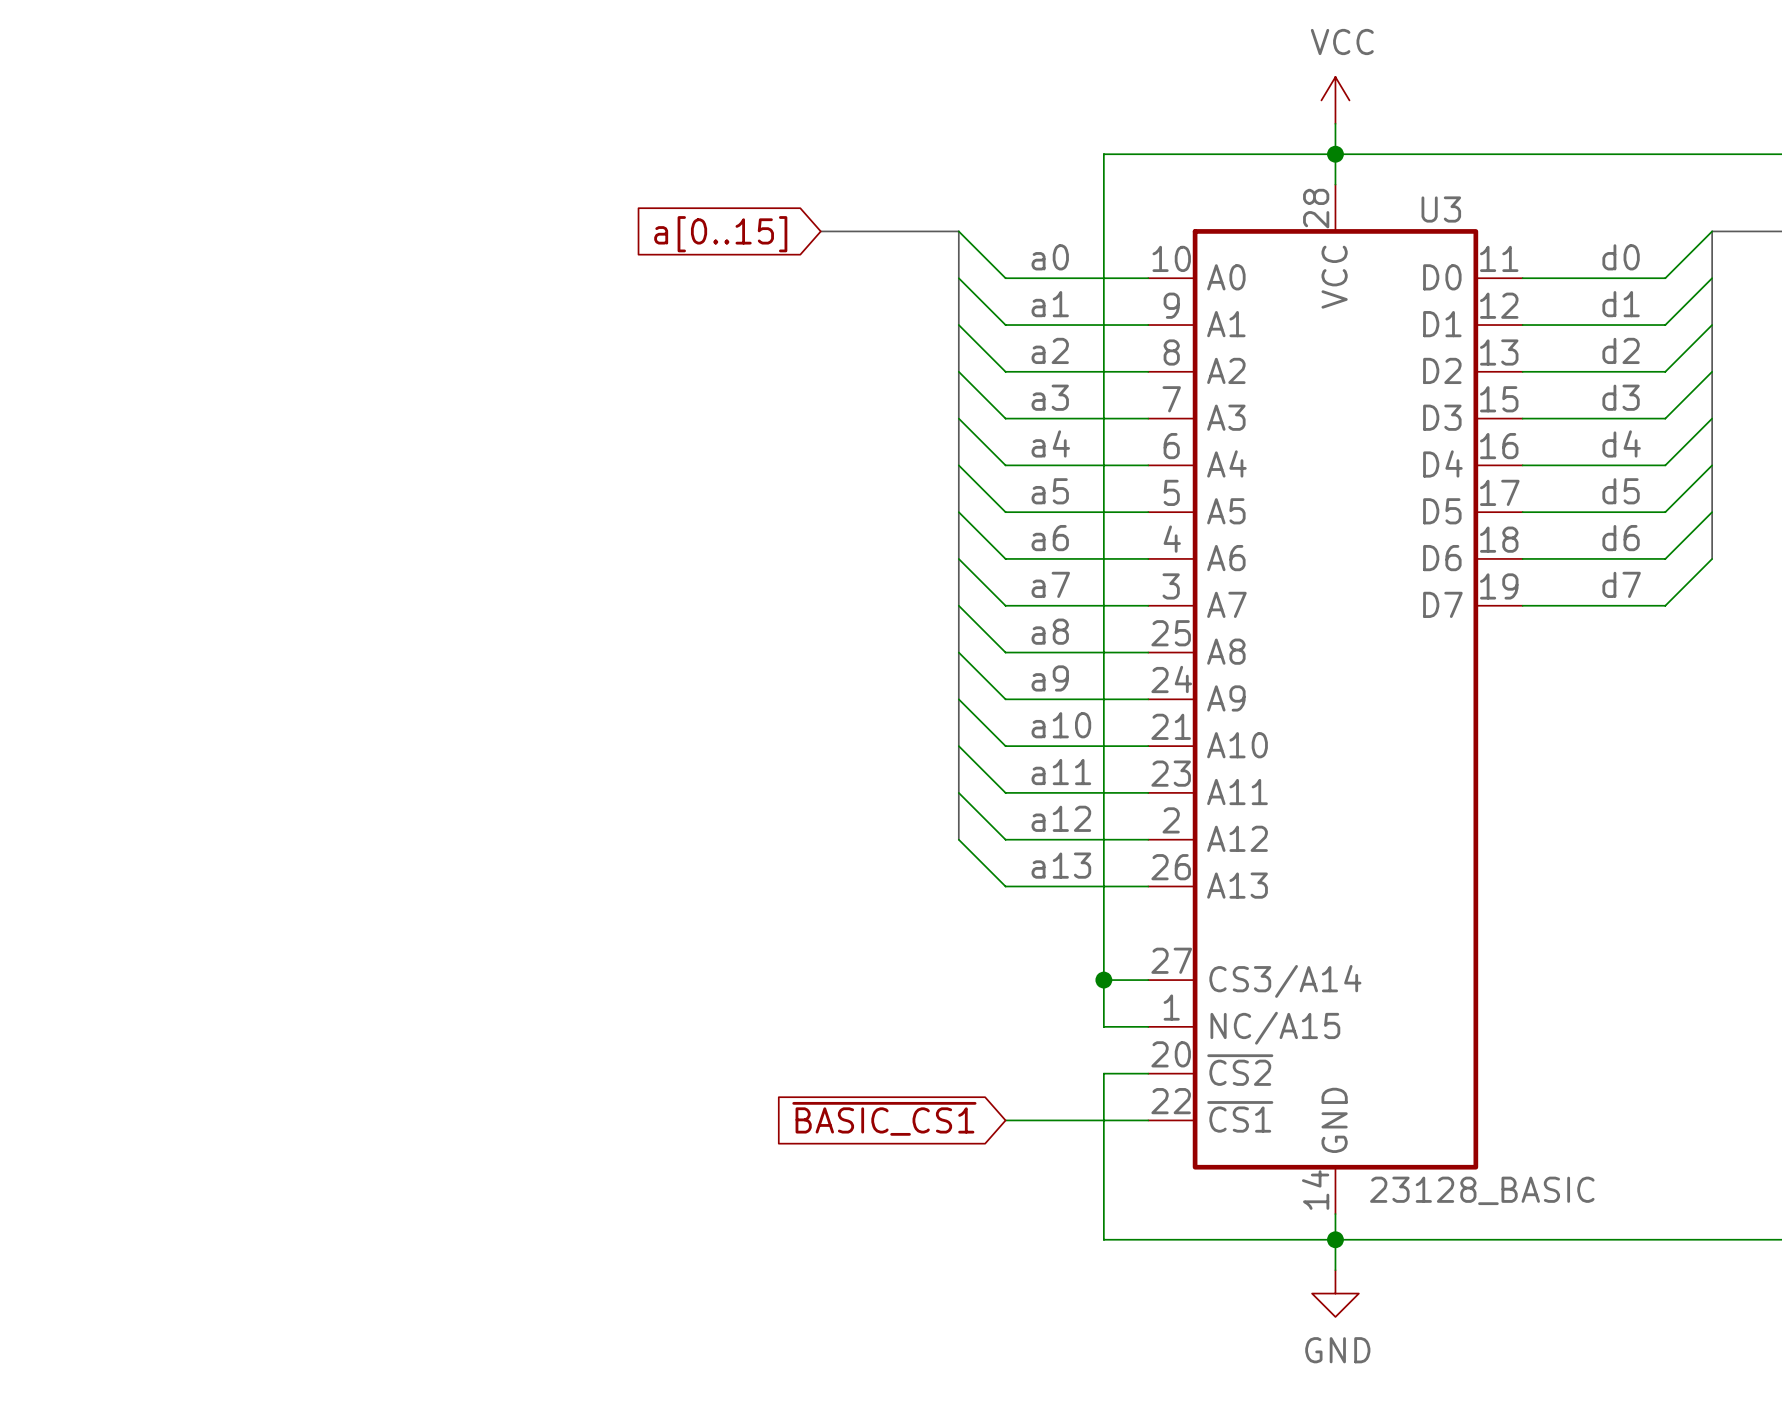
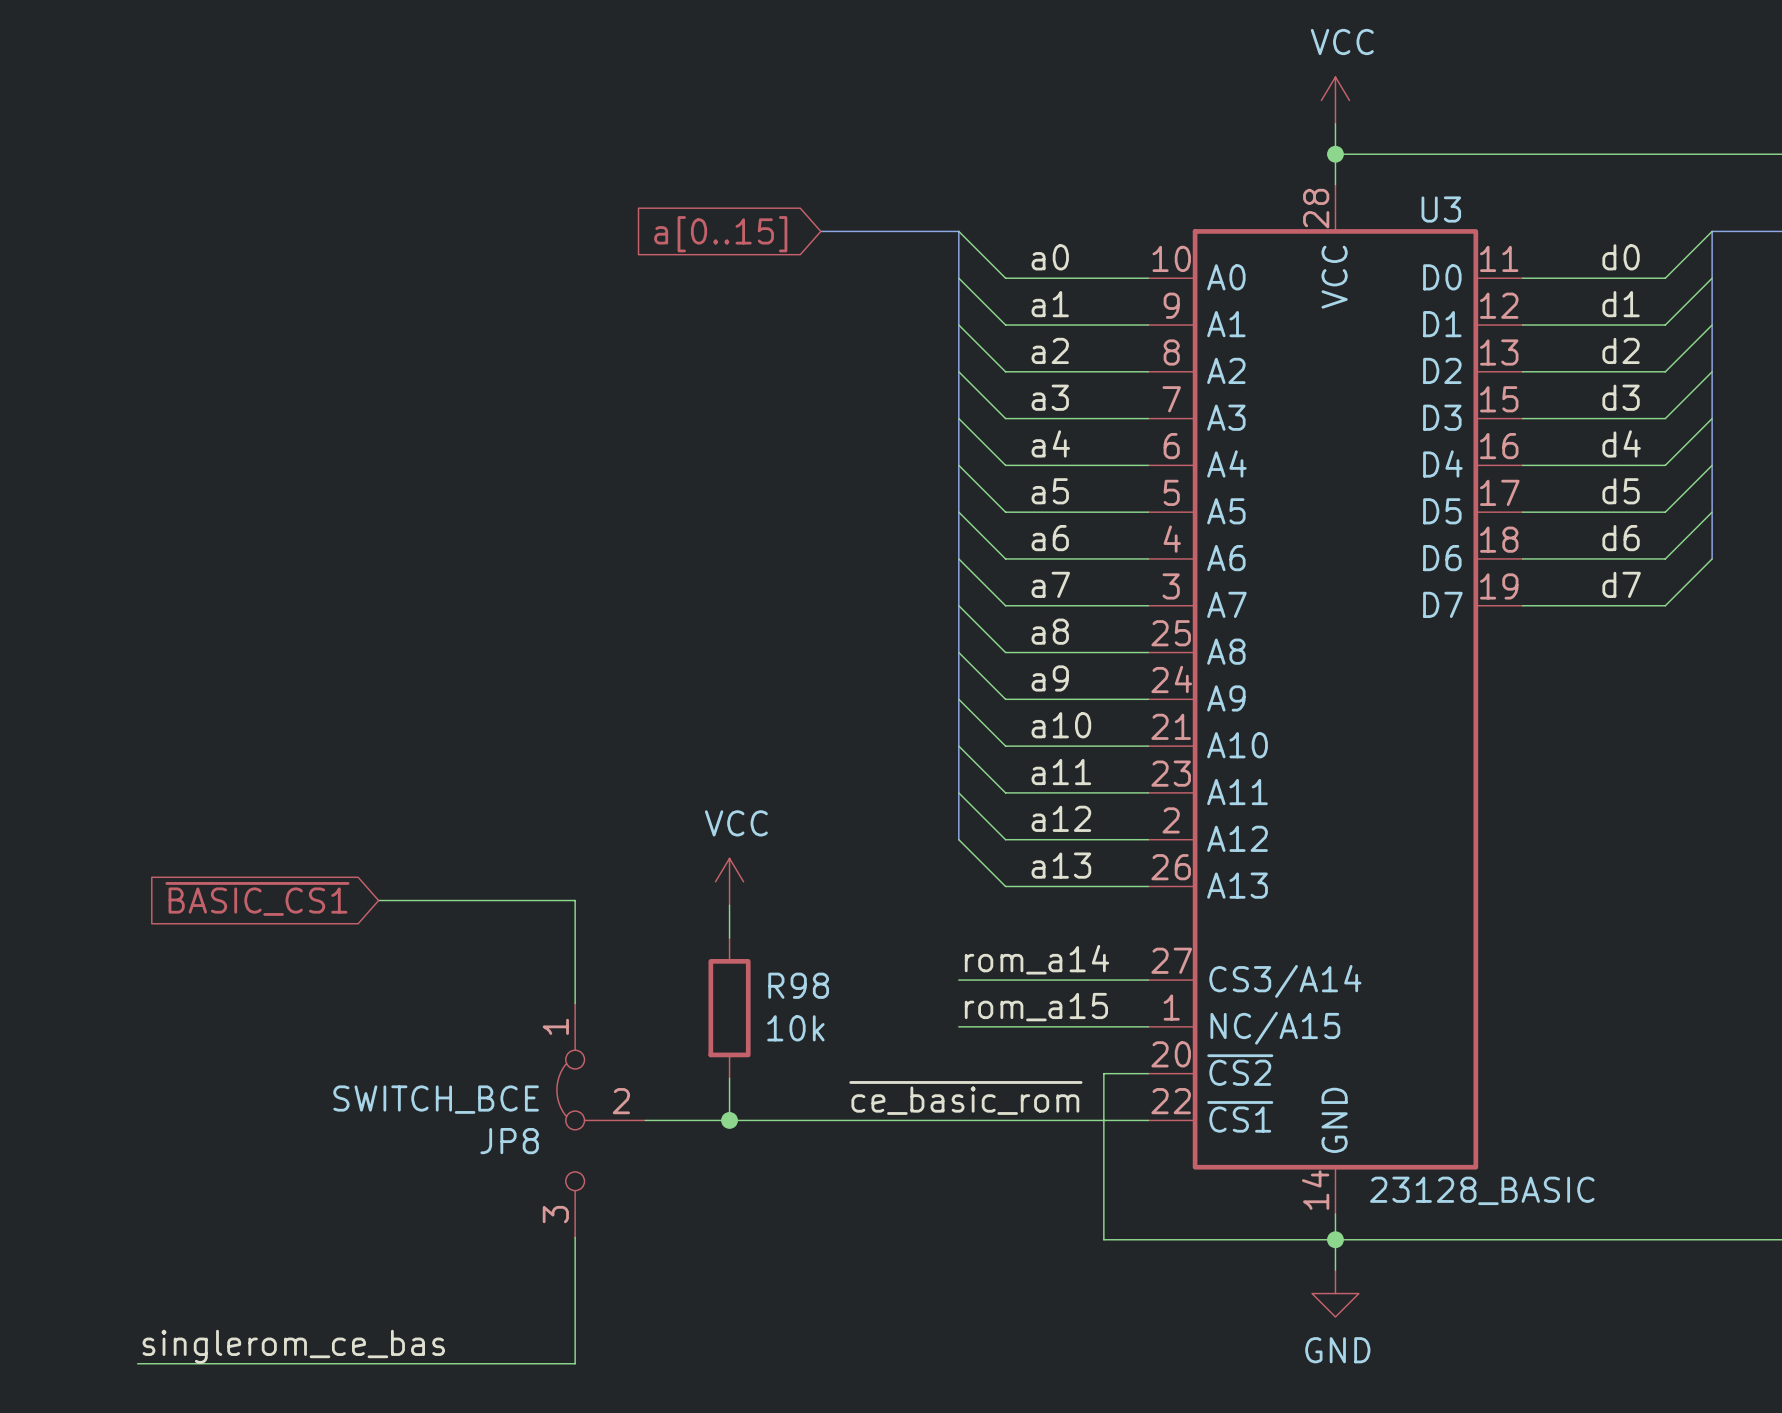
wire: (1335, 154) (1103, 154) (1103, 1026) -> (958, 1026) (1103, 1026)
power symbol: none -> VCC (729, 881)
global label: none -> ~{BASIC_CS1} (257, 898)
wire: none -> (378, 900) (575, 900) (575, 1003)
wire: none -> (729, 905) (729, 937)
label: none -> rom_a14 (1036, 959)
wire: none -> (958, 980) (1103, 980)
junction: (1103, 980) -> none
label: none -> rom_a15 (1036, 1007)
R98: none -> 10k (729, 1008)
wire: none -> (729, 1078) (729, 1120)
label: none -> ~{ce_basic_rom} (965, 1097)
global label: ~{BASIC_CS1} (884, 1118) -> none
JP8: none -> SWITCH_BCE (601, 1120)
wire: none -> (645, 1120) (1005, 1120)
junction: none -> (729, 1120)
wire: none -> (575, 1237) (575, 1363) (137, 1363)
label: none -> singlerom_ce_bas (293, 1346)

